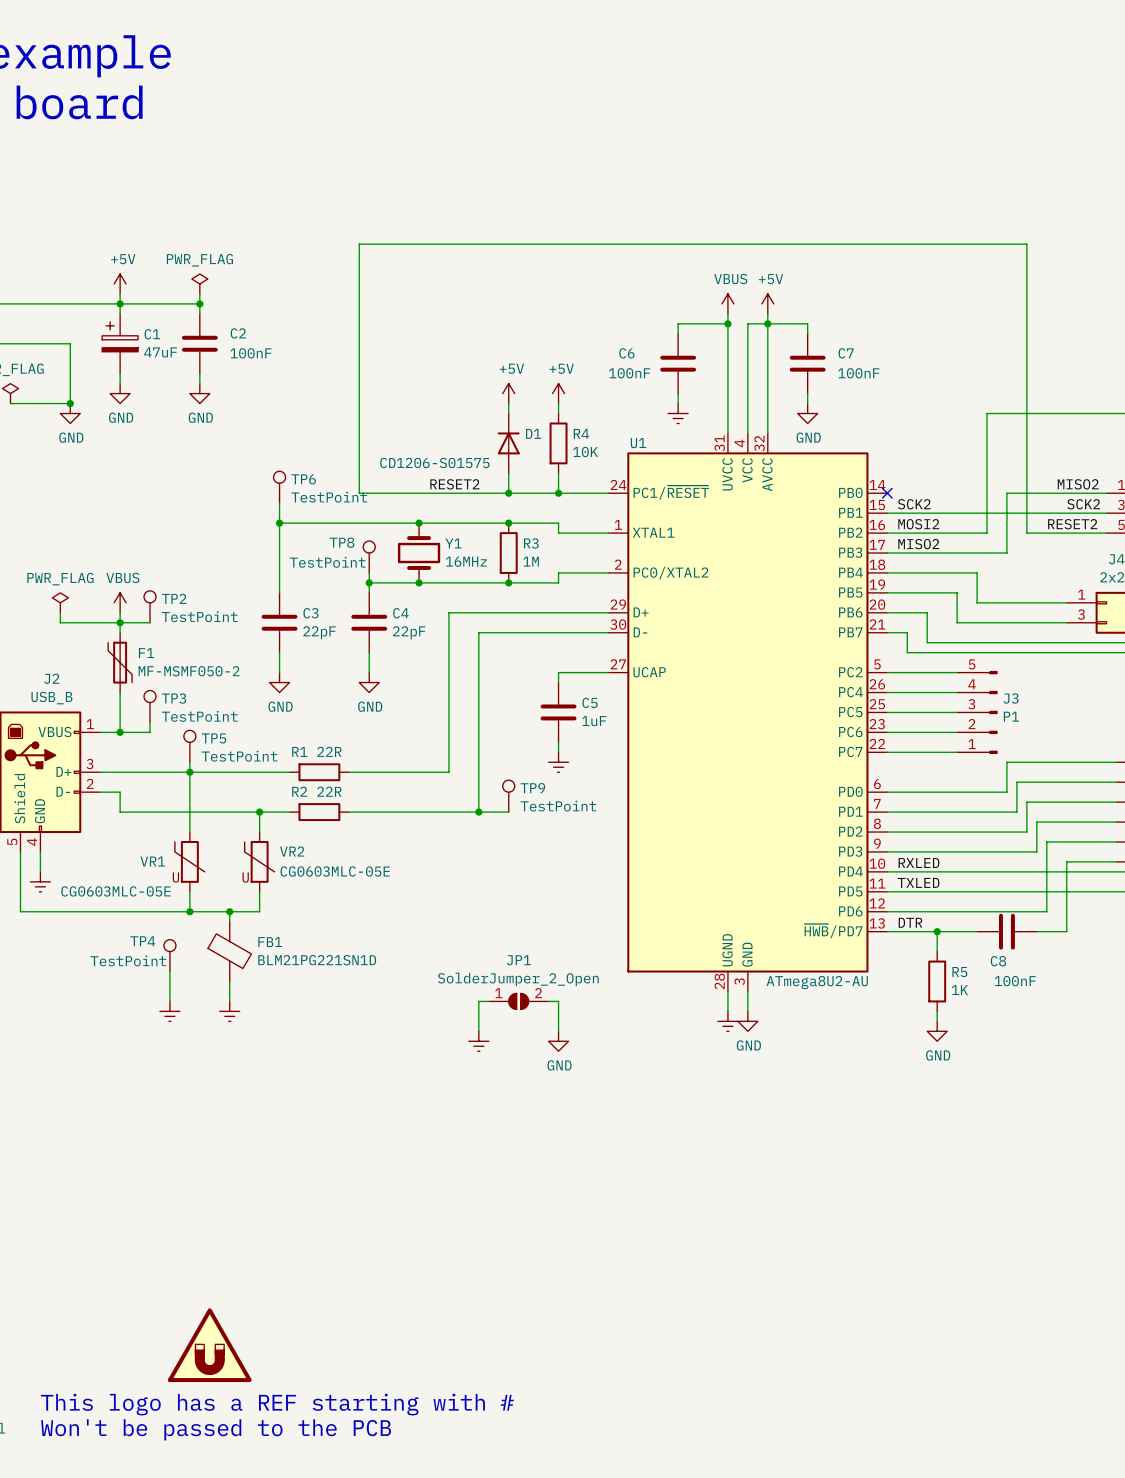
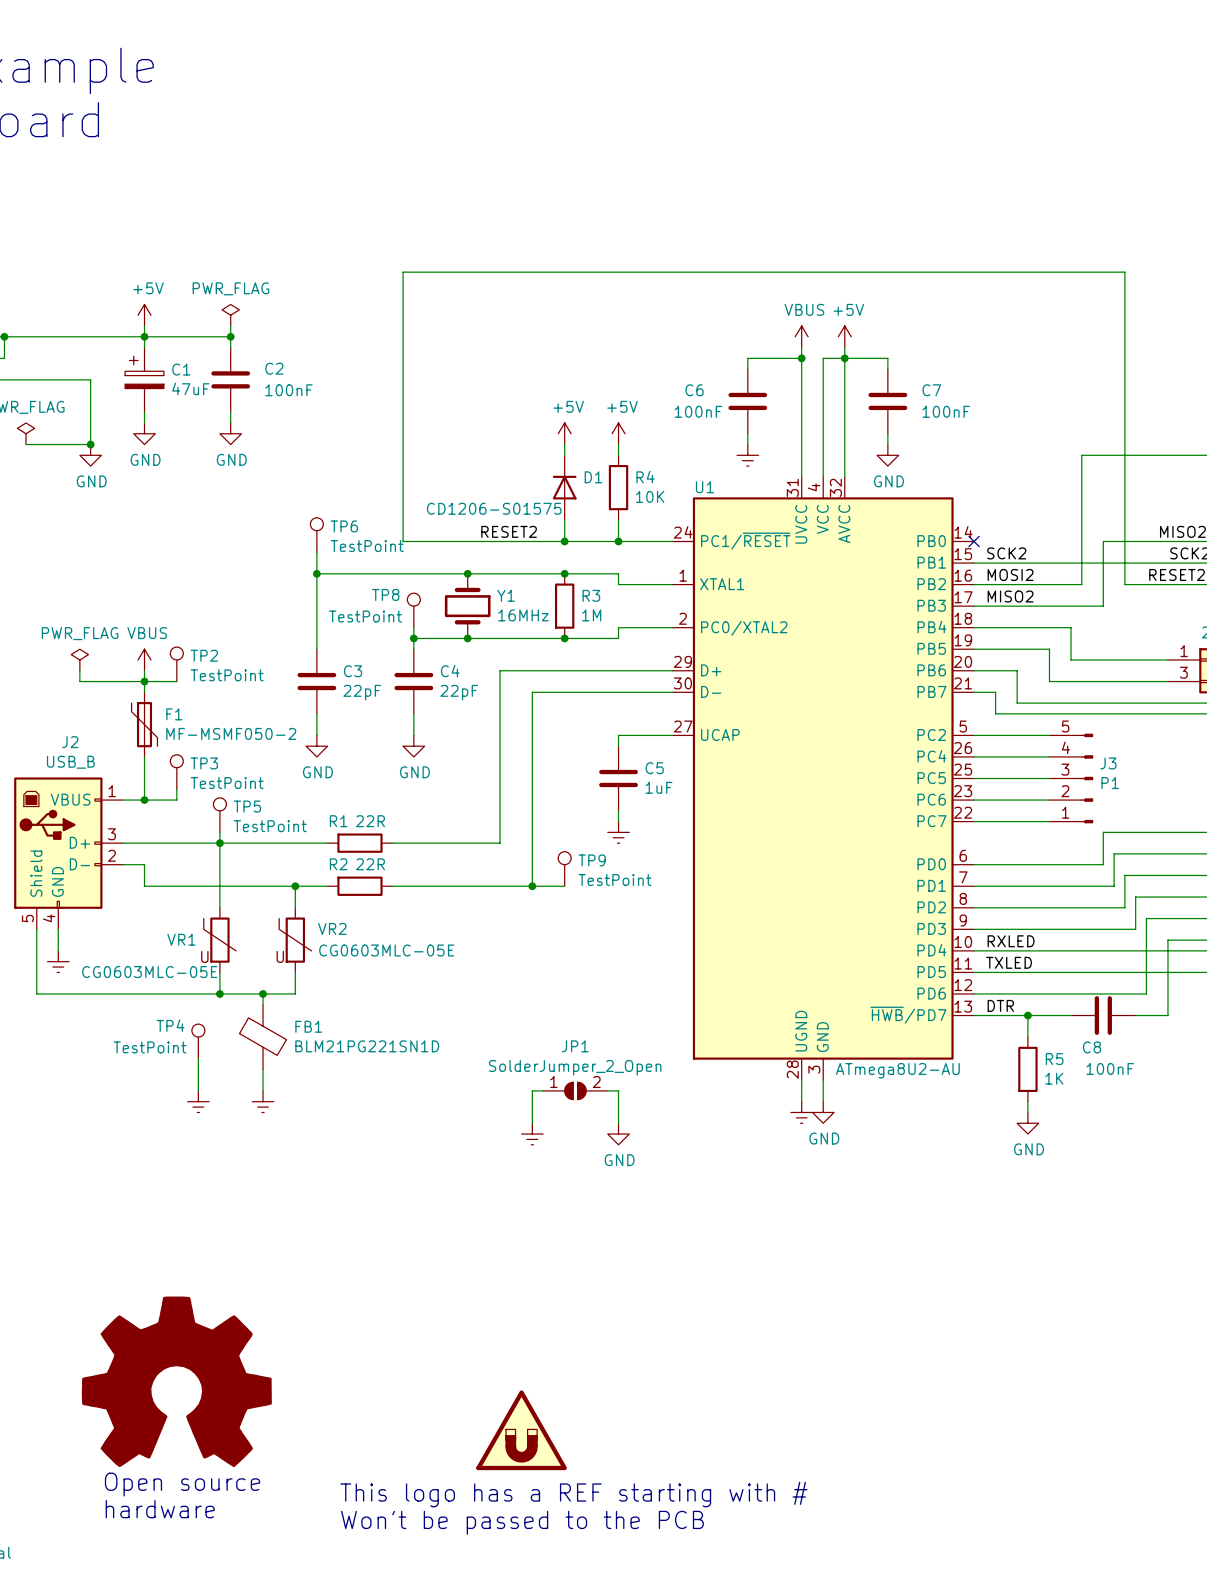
part: none -> (176, 1381)
power symbol: none -> (521, 1430)
power symbol: (209, 1345) -> none
text: none -> Open source (182, 1484)
text: none -> This logo has a REF starting with # (573, 1494)
text: none -> hardware (160, 1509)
text: none -> Won't be passed to the PCB (522, 1522)
text: This logo has a REF starting with # (277, 1404) -> none
text: Won't be passed to the PCB (216, 1429) -> none

